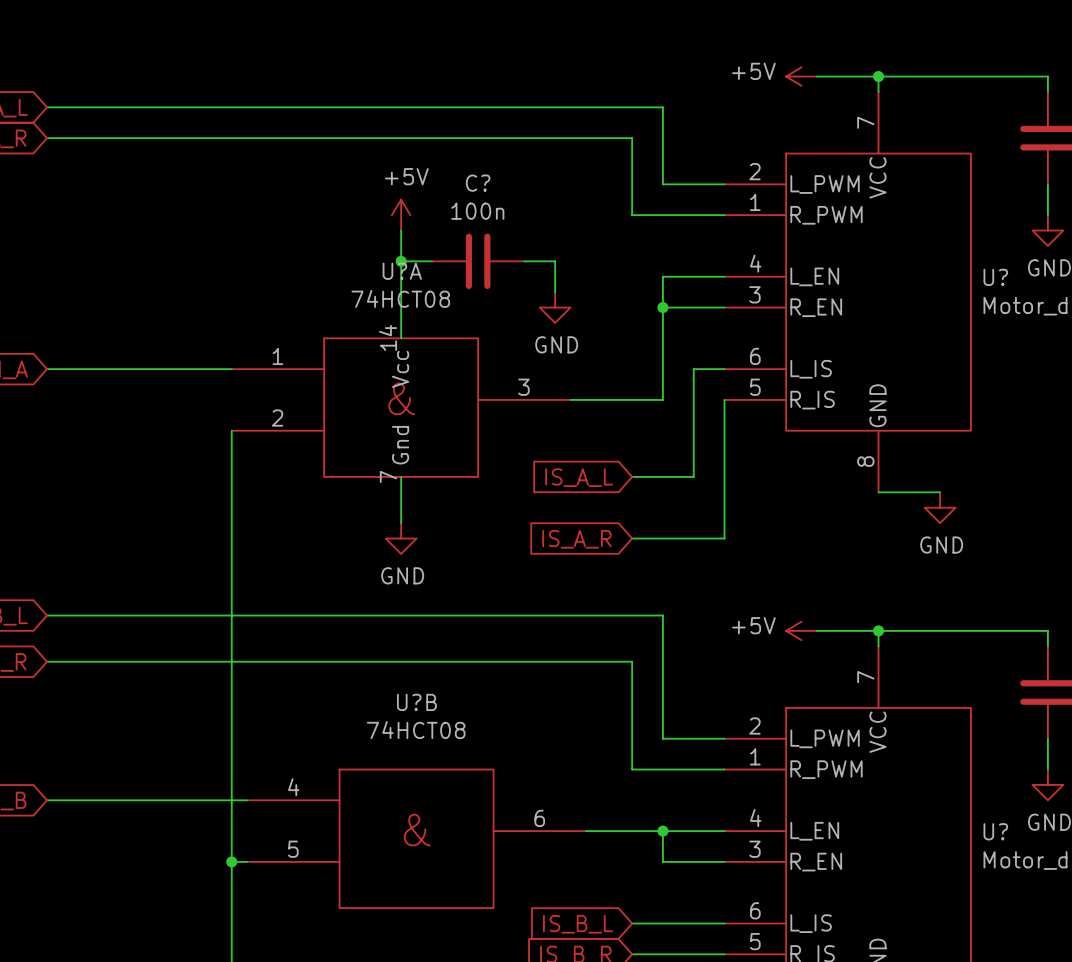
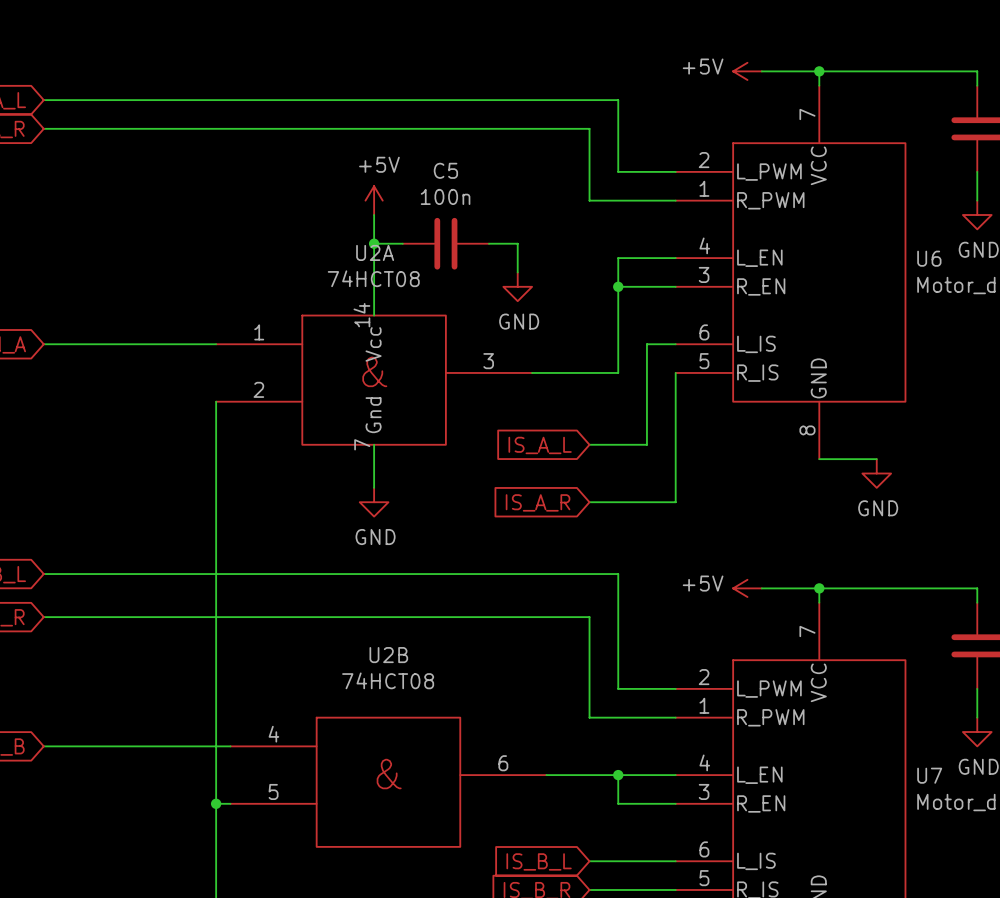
C? name: C? (478, 183) -> C5 (445, 170)
U?A name: U?A (402, 271) -> U2A (375, 252)
U? name: U? (995, 277) -> U6 (929, 258)
U?B name: U?B (416, 702) -> U2B (388, 655)
U? name: U? (995, 831) -> U7 (929, 775)

